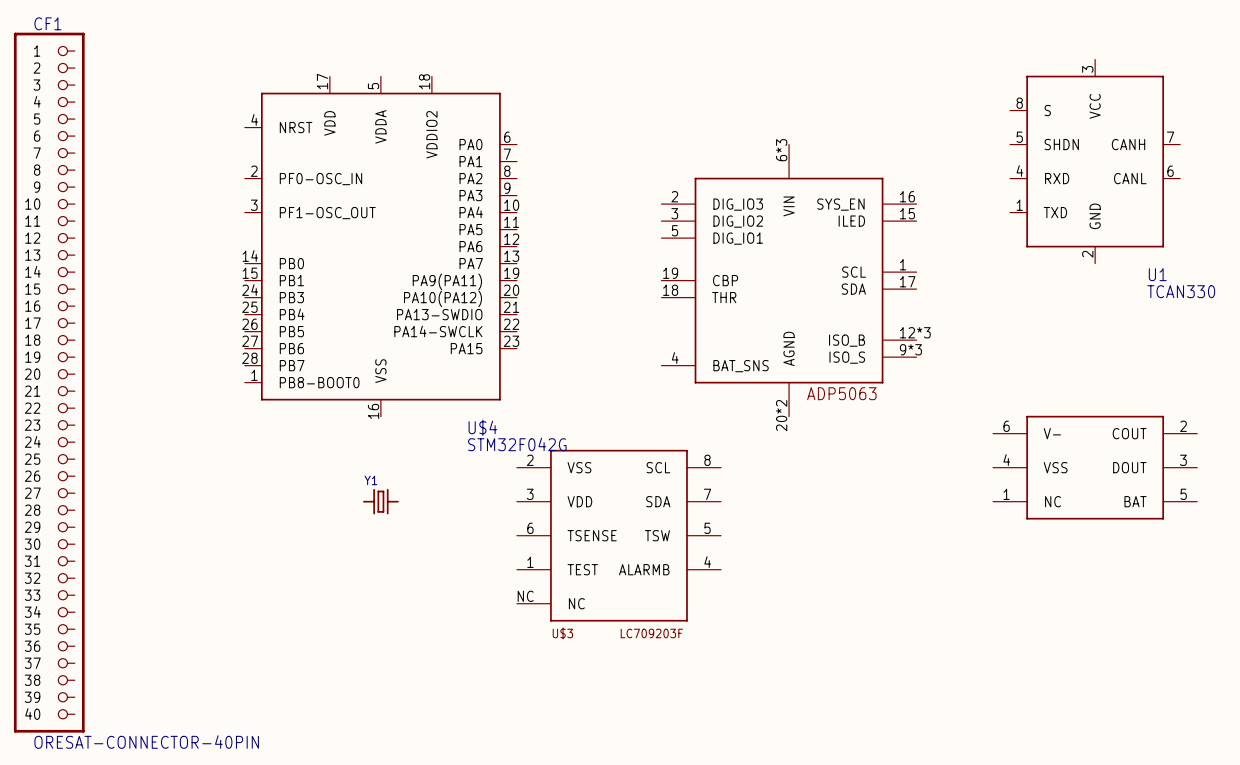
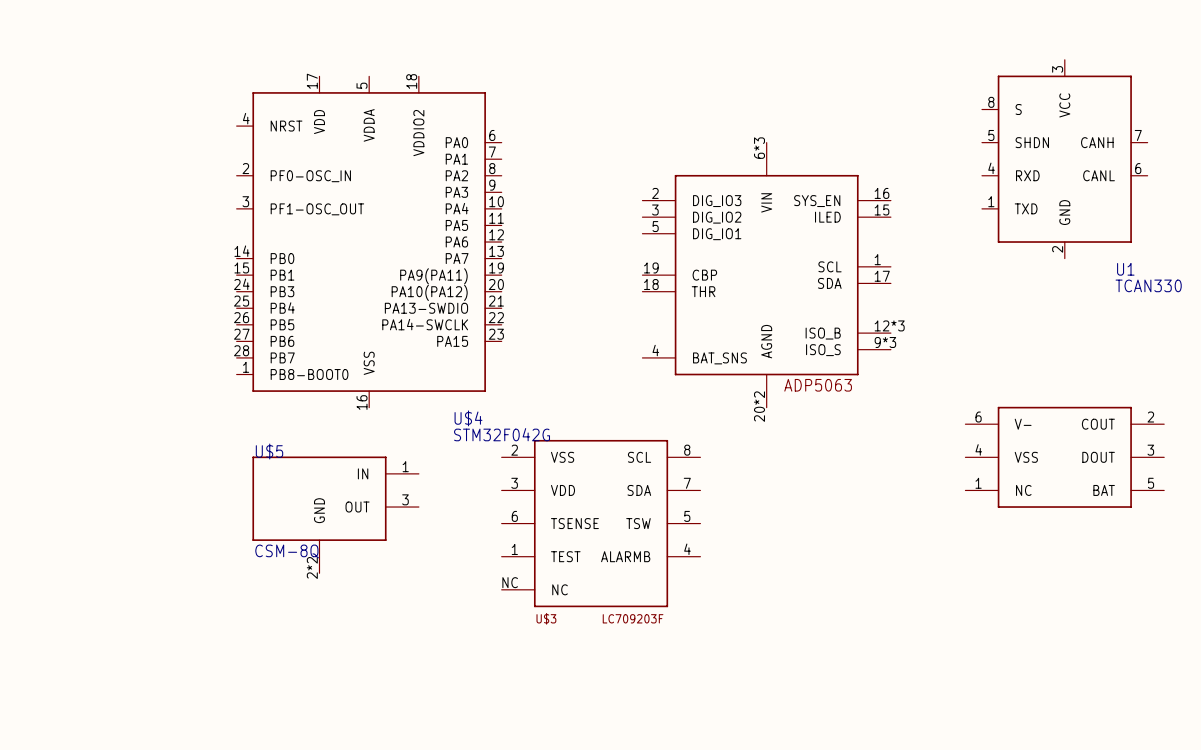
CF1: ORESAT-CONNECTOR-40PIN (49, 382) -> none
Y1: (380, 501) -> none
U$5: none -> CSM-8Q (335, 514)

